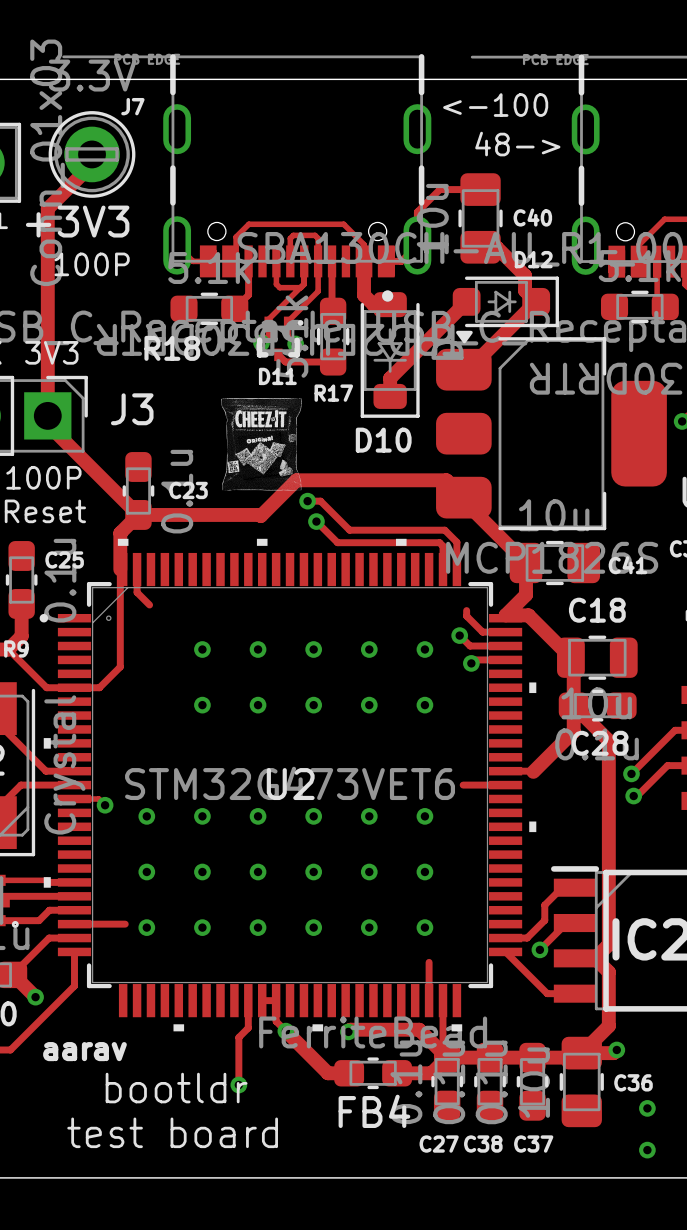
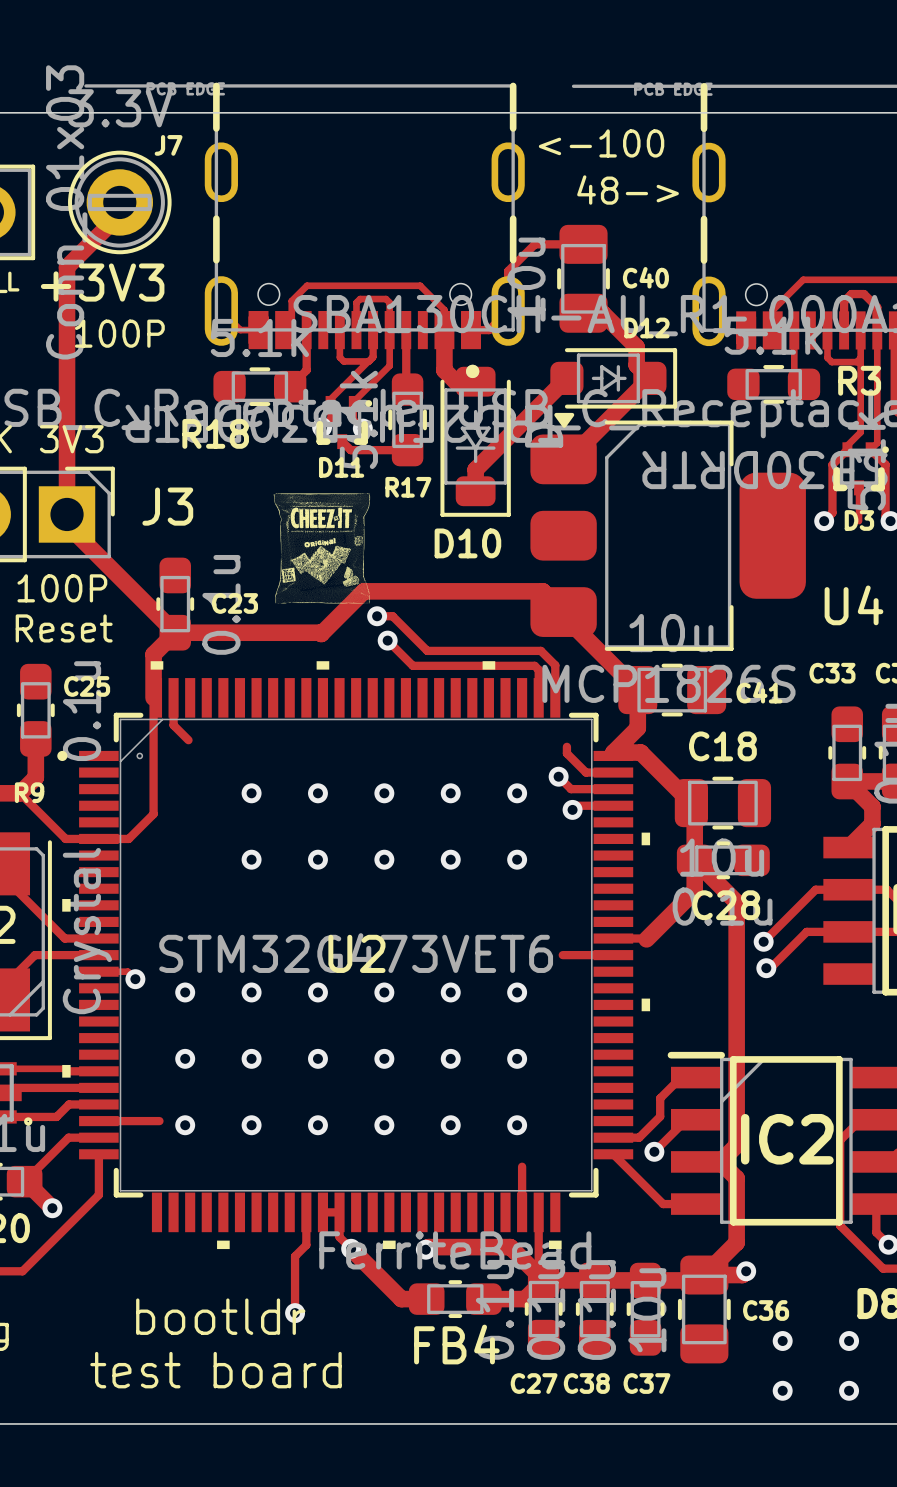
text: aarav (84, 1051) -> none

